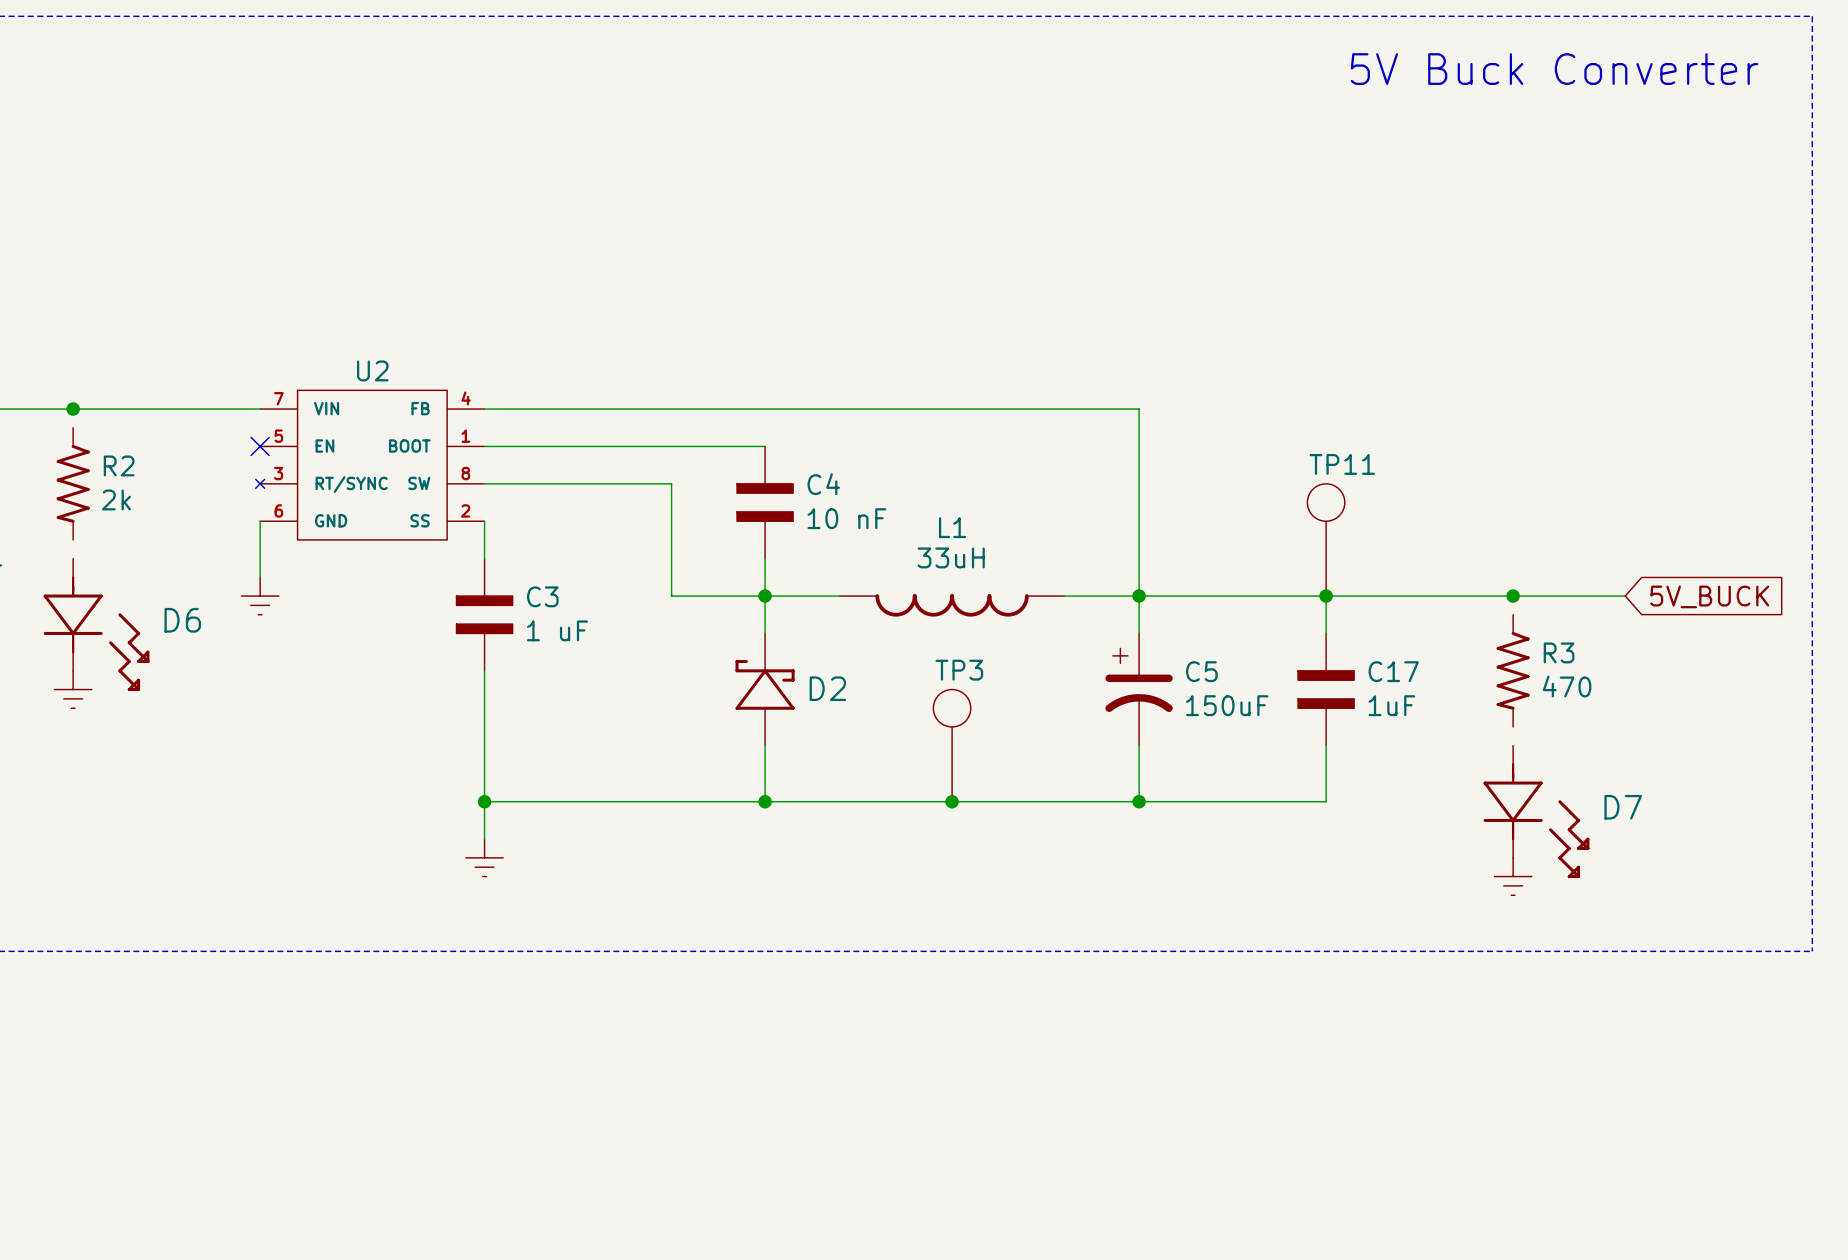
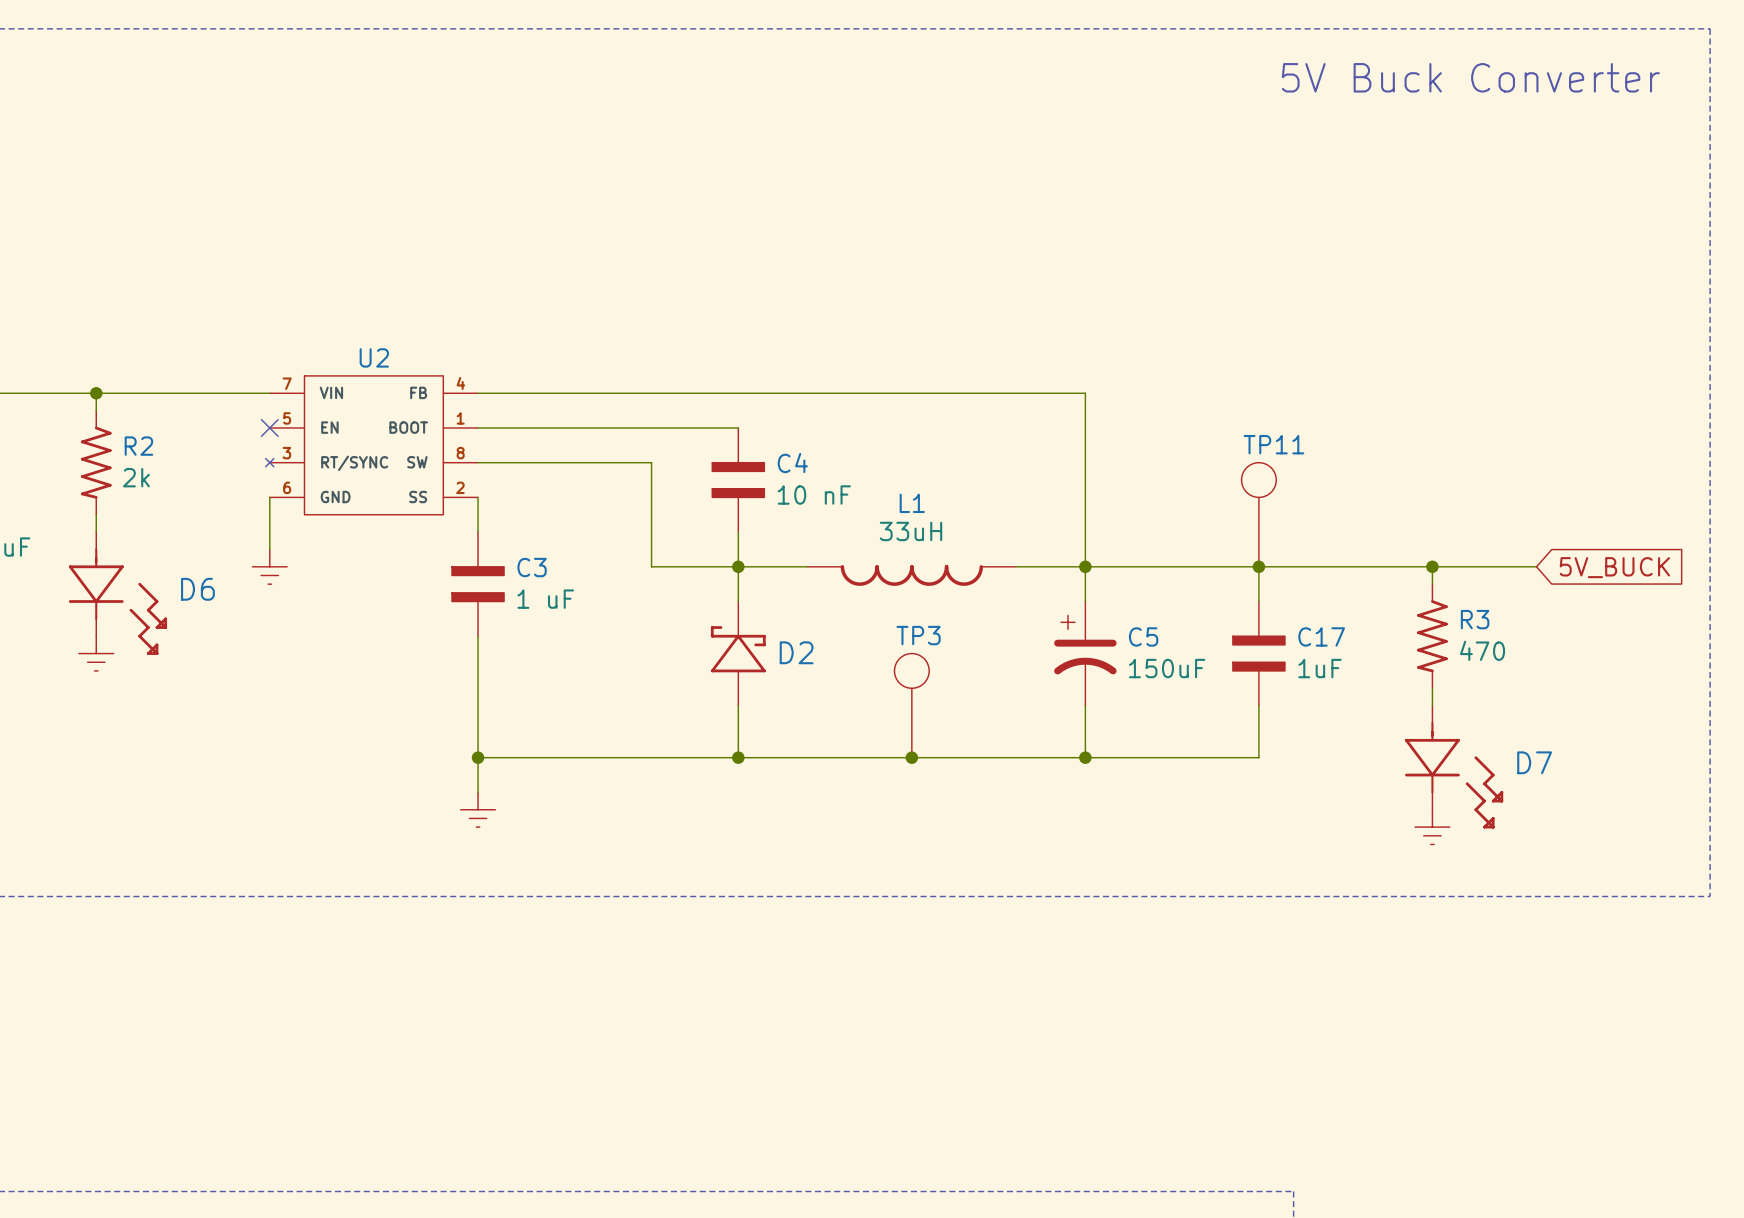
wire: none -> (96, 393) (96, 410)
wire: none -> (96, 514) (96, 532)
wire: none -> (1432, 566) (1432, 584)
wire: none -> (1432, 688) (1432, 705)

